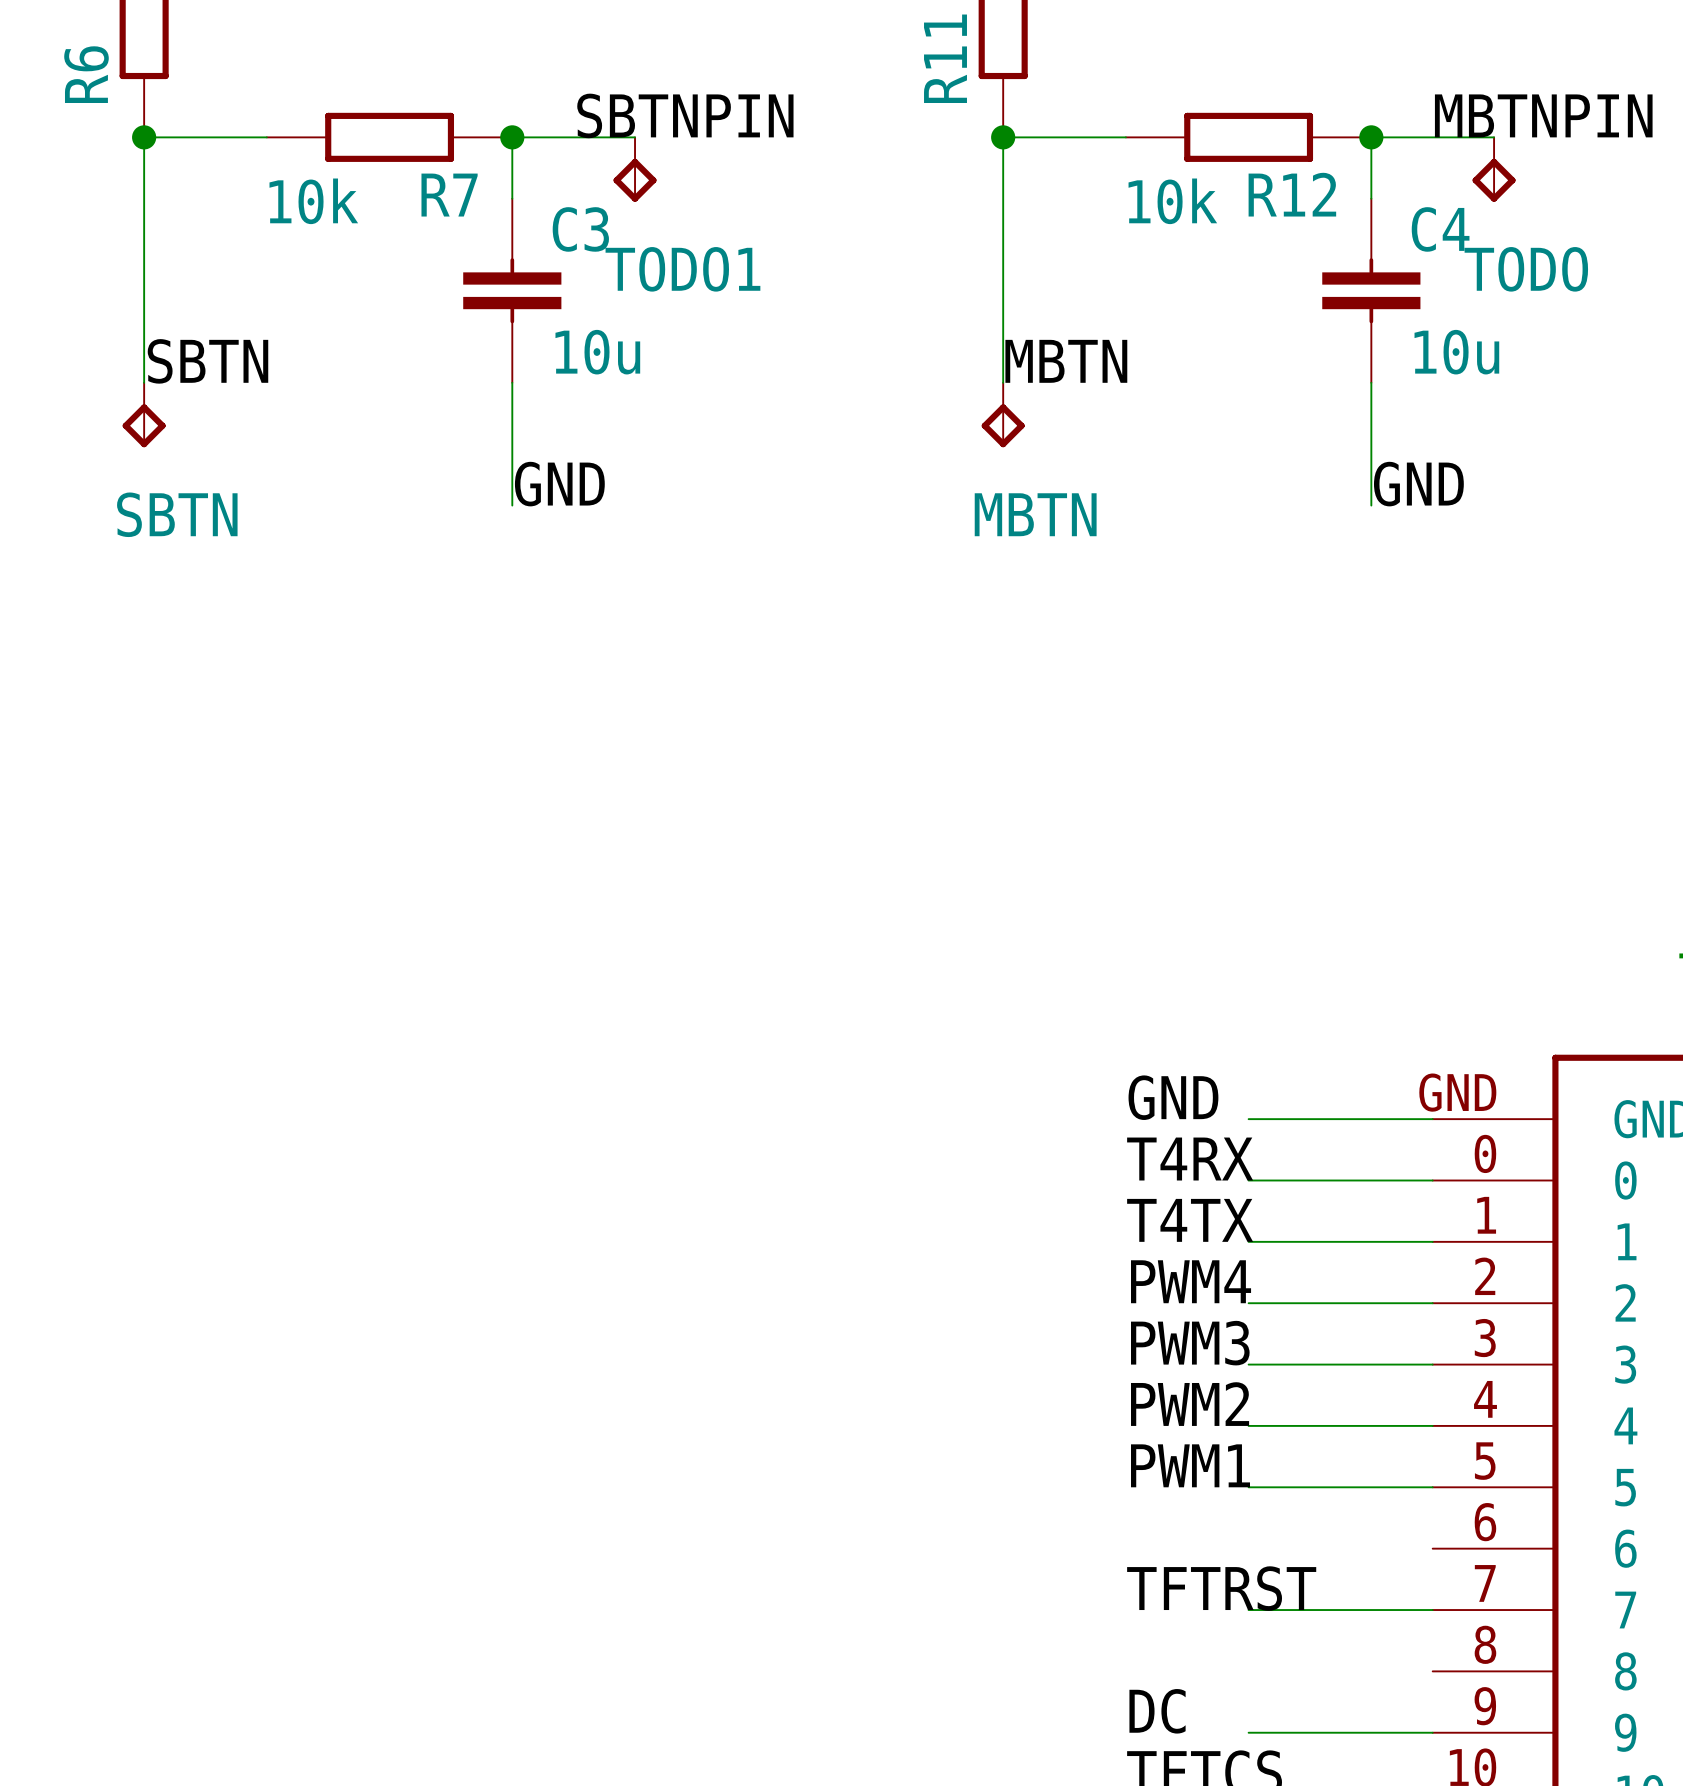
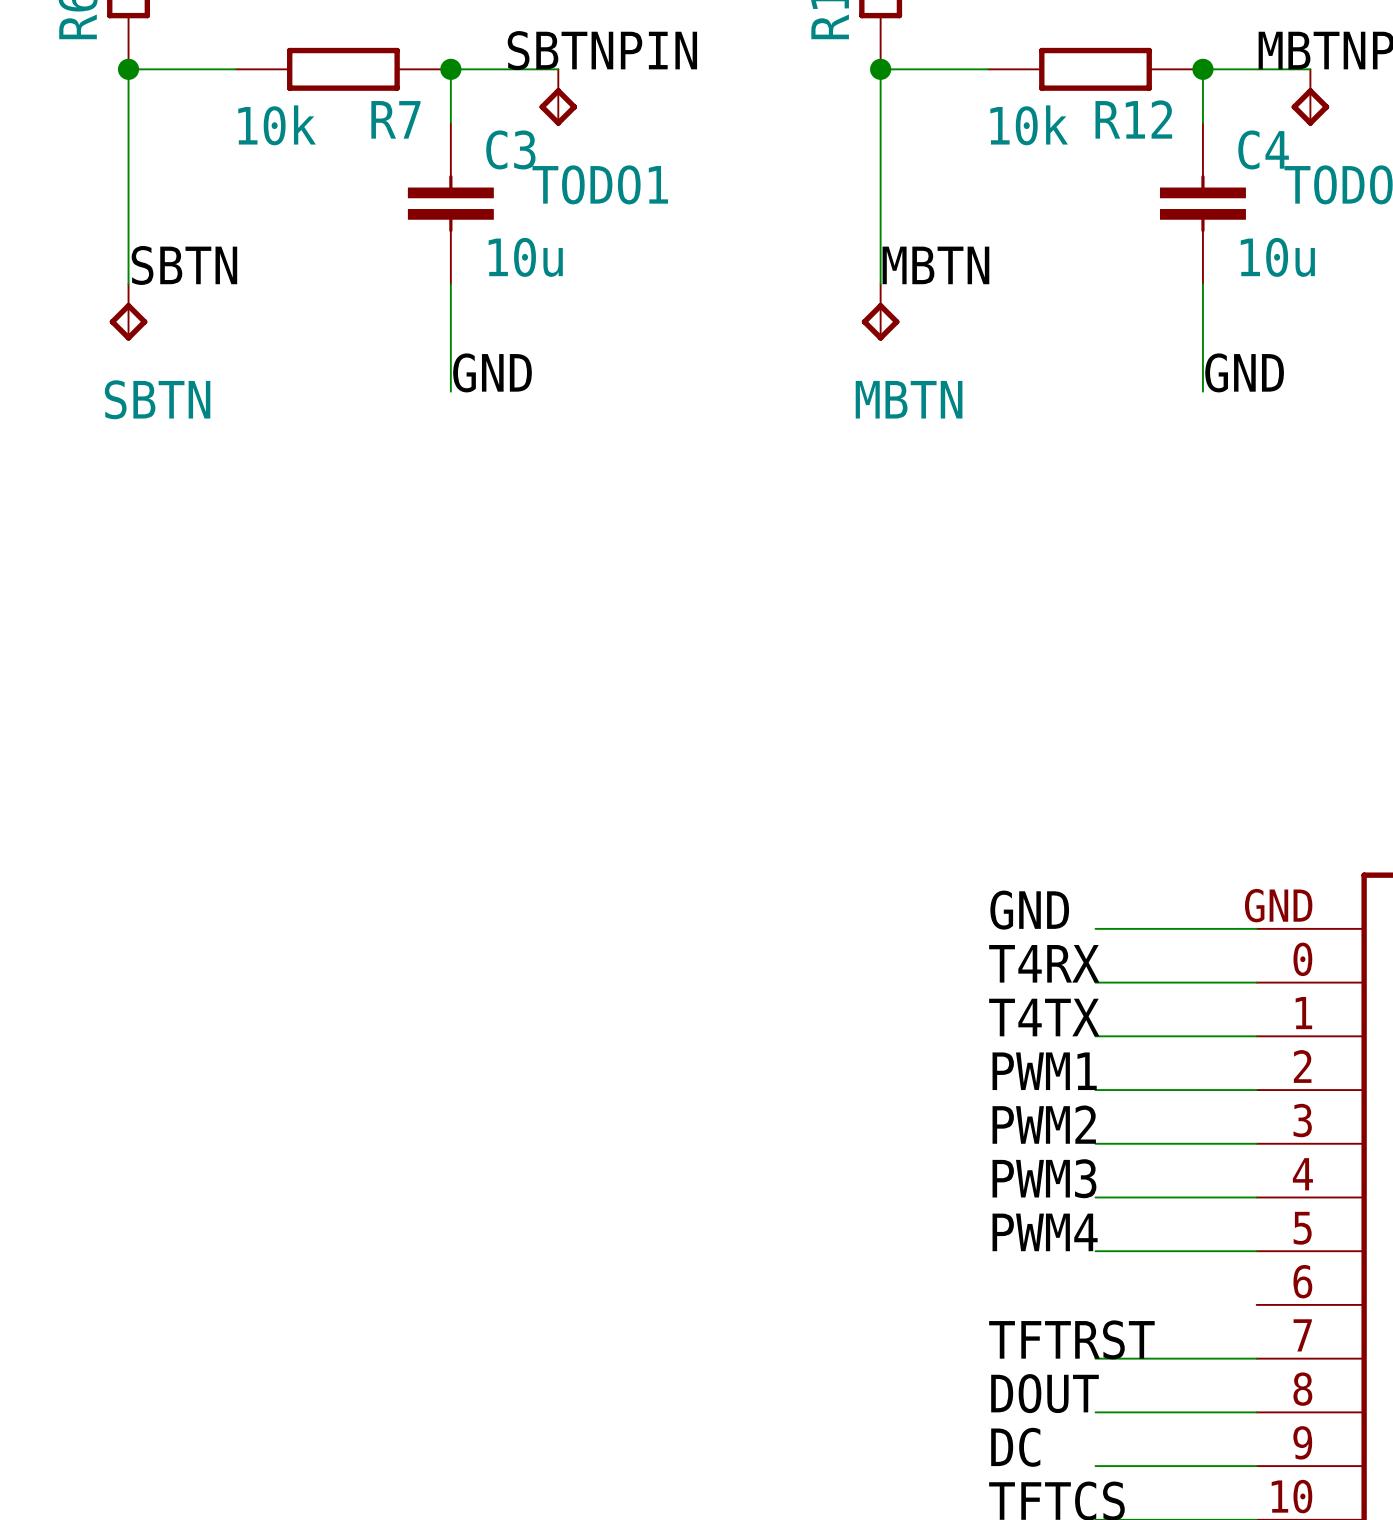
label: PWM4 (1191, 1281) -> PWM1 (1044, 1071)
label: PWM3 (1190, 1343) -> PWM2 (1044, 1124)
label: PWM2 (1190, 1404) -> PWM3 (1044, 1178)
label: PWM1 (1190, 1465) -> PWM4 (1045, 1232)
label: none -> DOUT (1044, 1393)
wire: none -> (1095, 1412) (1256, 1412)

